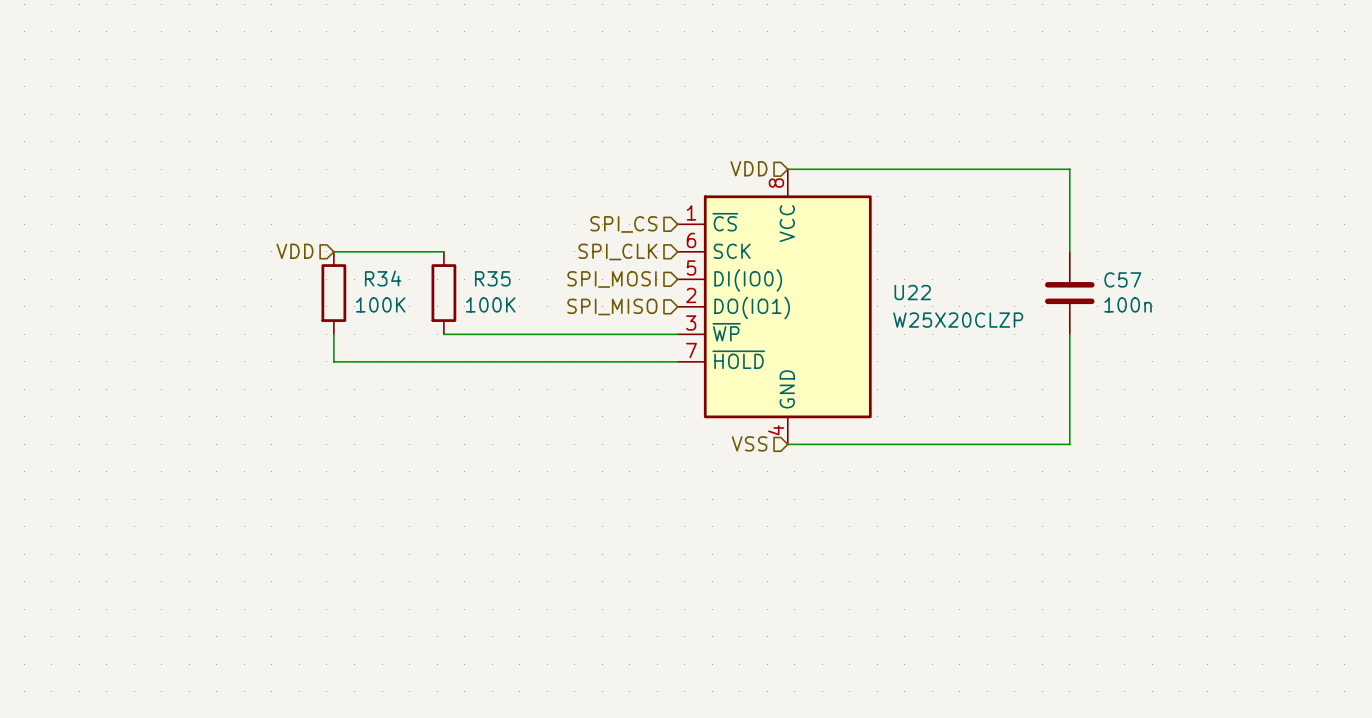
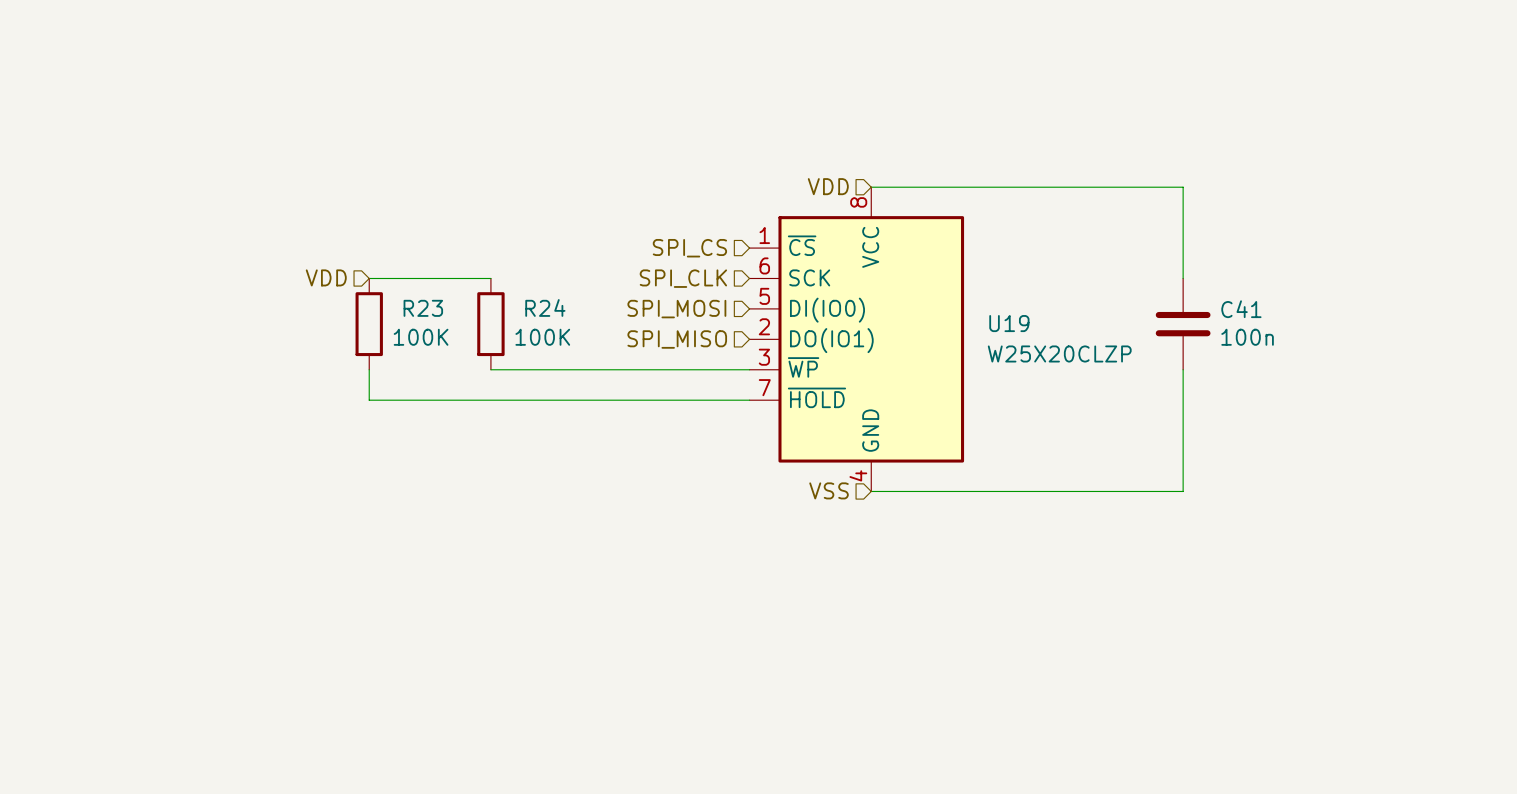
R34 name: R34 (383, 278) -> R23 (423, 308)
R35 name: R35 (492, 278) -> R24 (545, 307)
C57 name: C57 (1122, 279) -> C41 (1241, 309)
U22 name: U22 (912, 292) -> U19 (1009, 323)

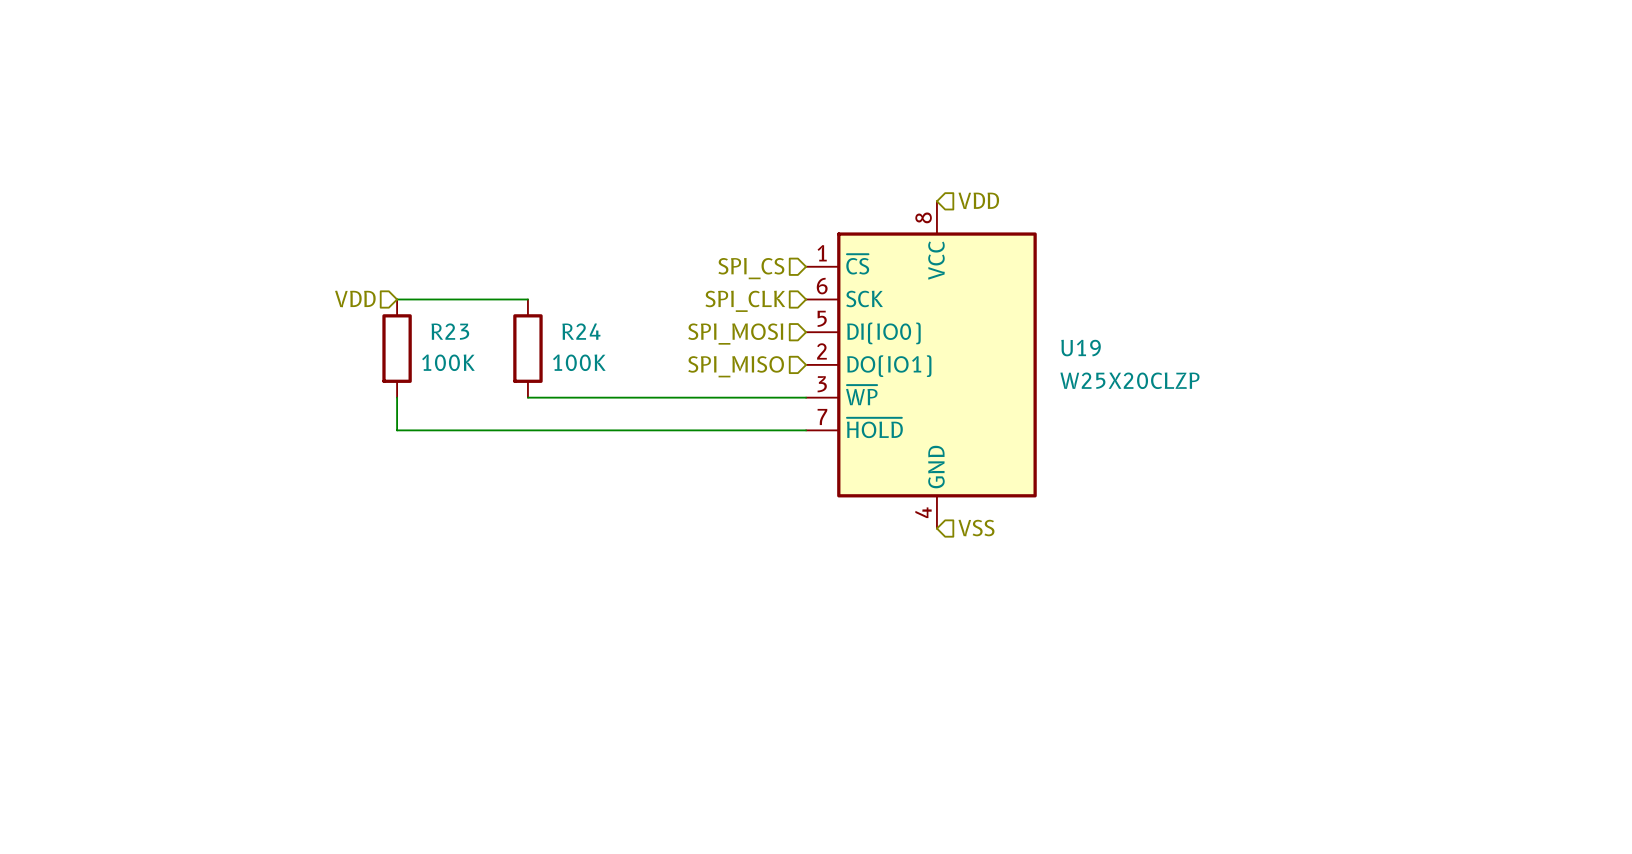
hierarchical label rotation: 0° (828, 186) -> 180° (978, 200)
hierarchical label position: VDD (828, 186) -> VDD (978, 200)
wire: (871, 187) (1183, 187) (1183, 278) -> none
C41: 100n (1183, 324) -> none
wire: (1183, 369) (1183, 491) (871, 491) -> none
hierarchical label rotation: 0° (829, 490) -> 180° (976, 528)
hierarchical label position: VSS (829, 490) -> VSS (976, 528)

